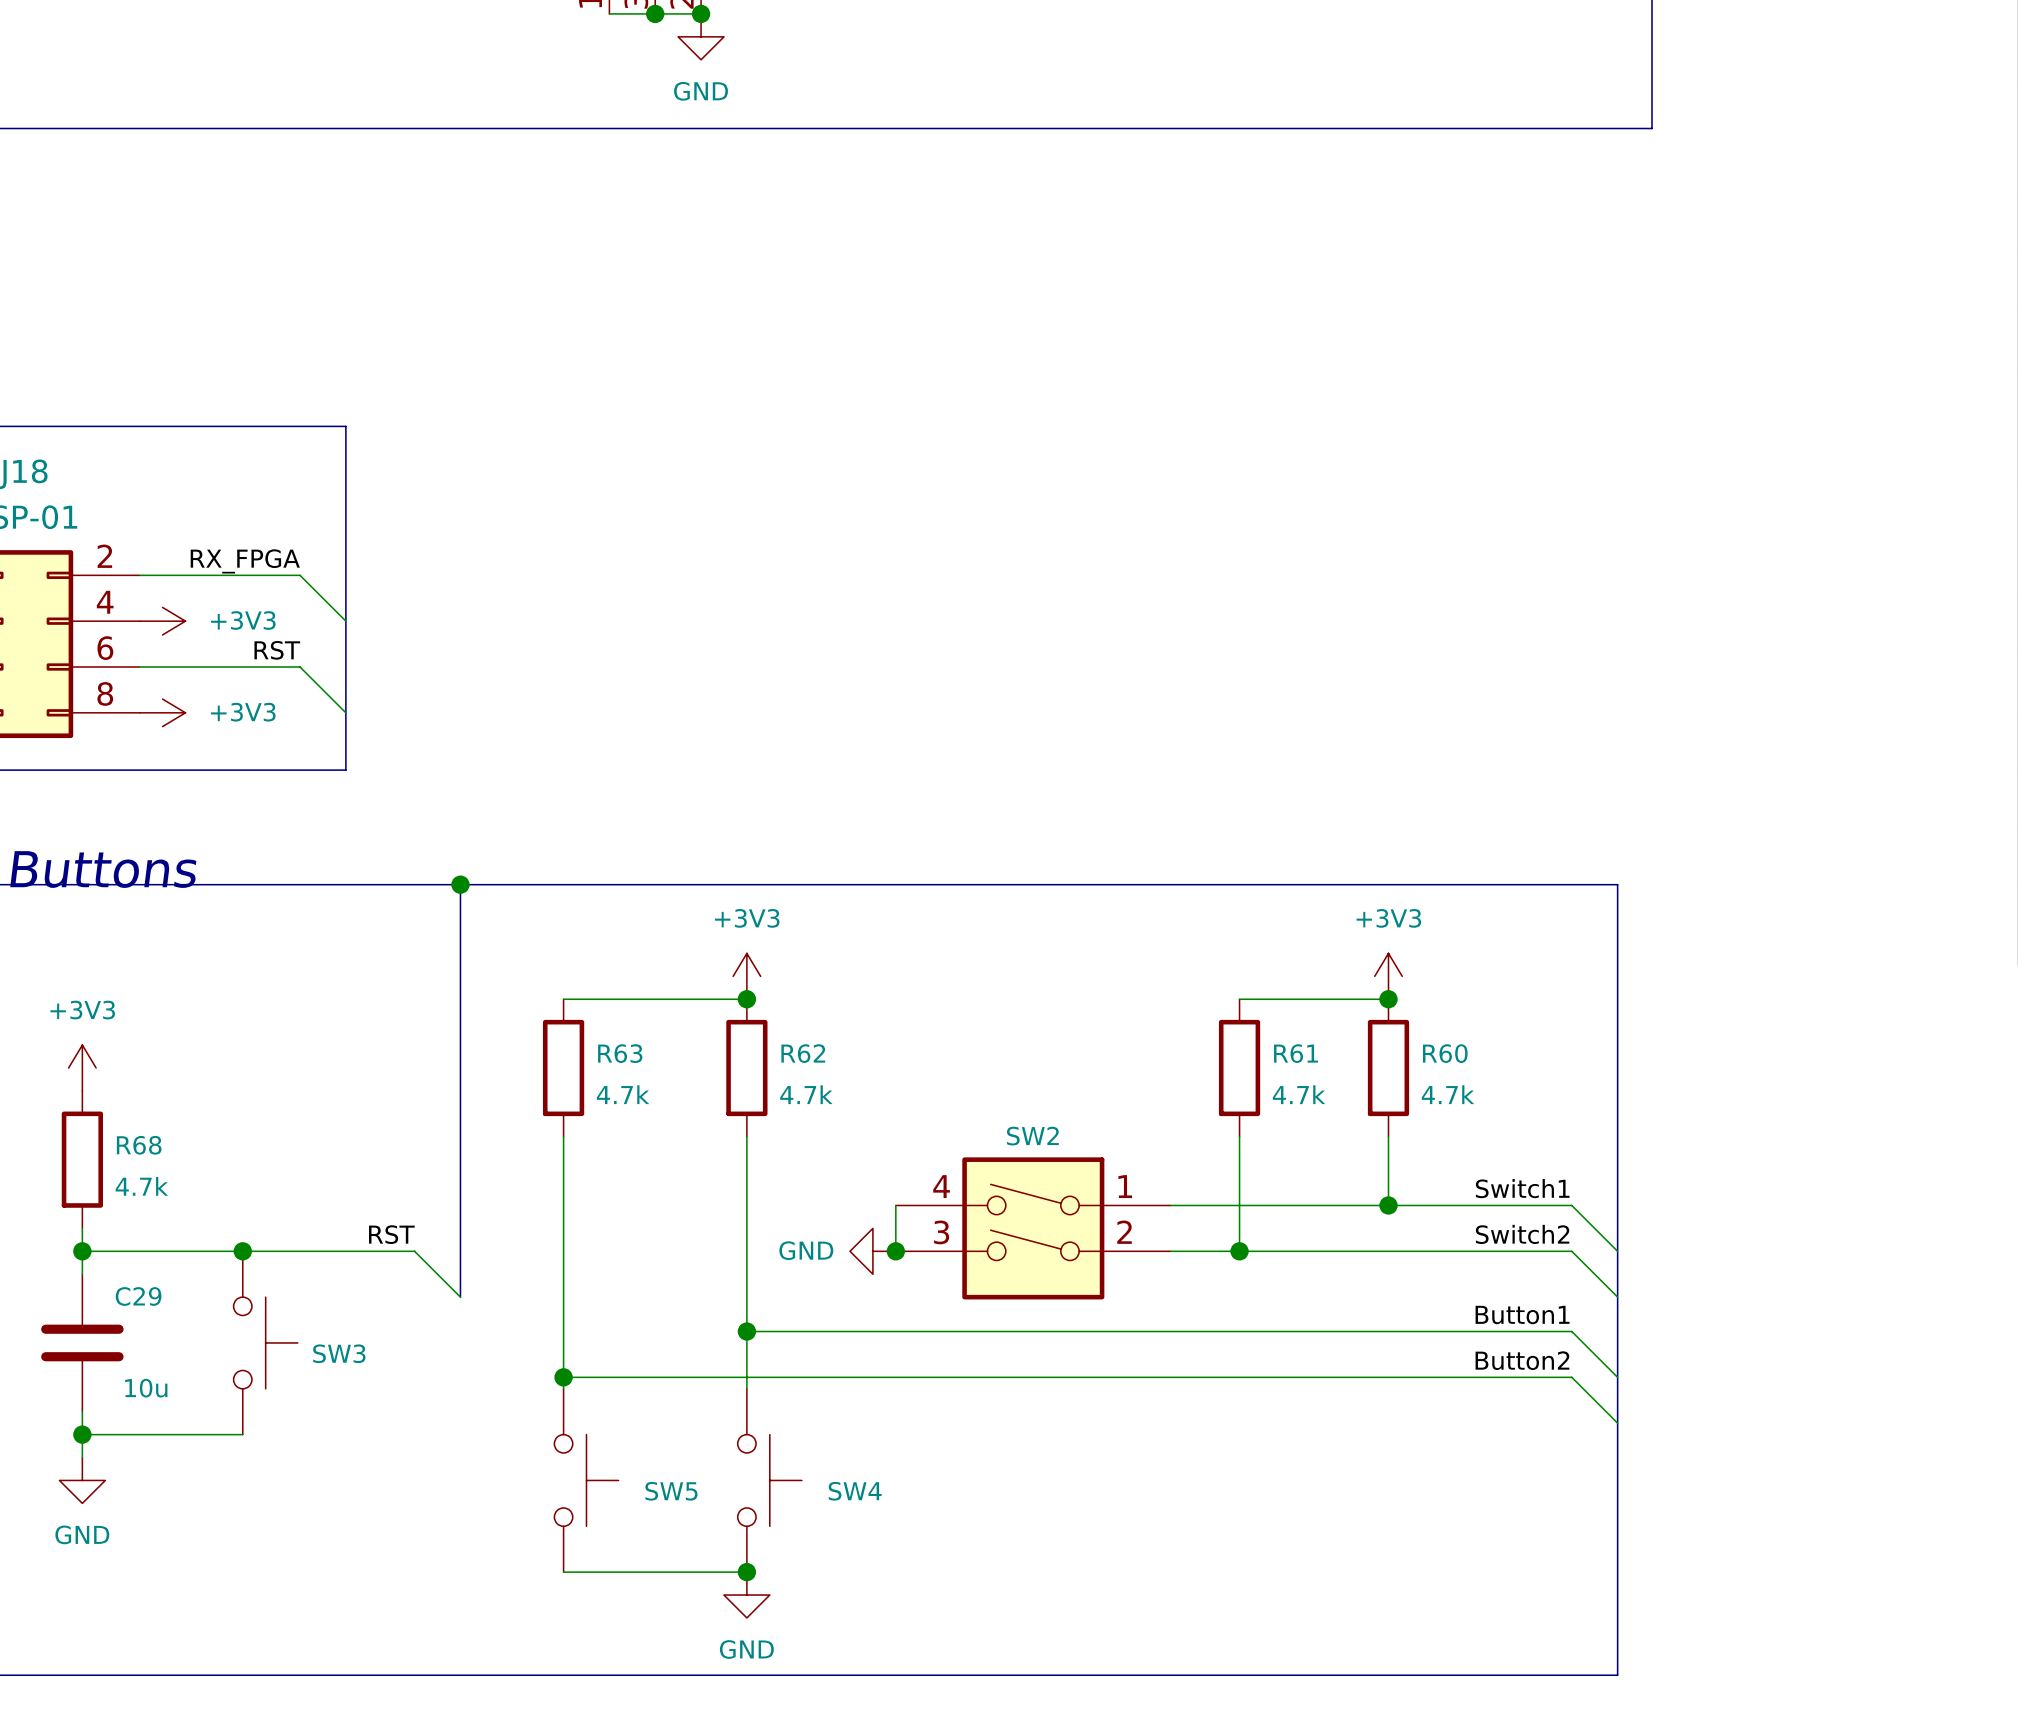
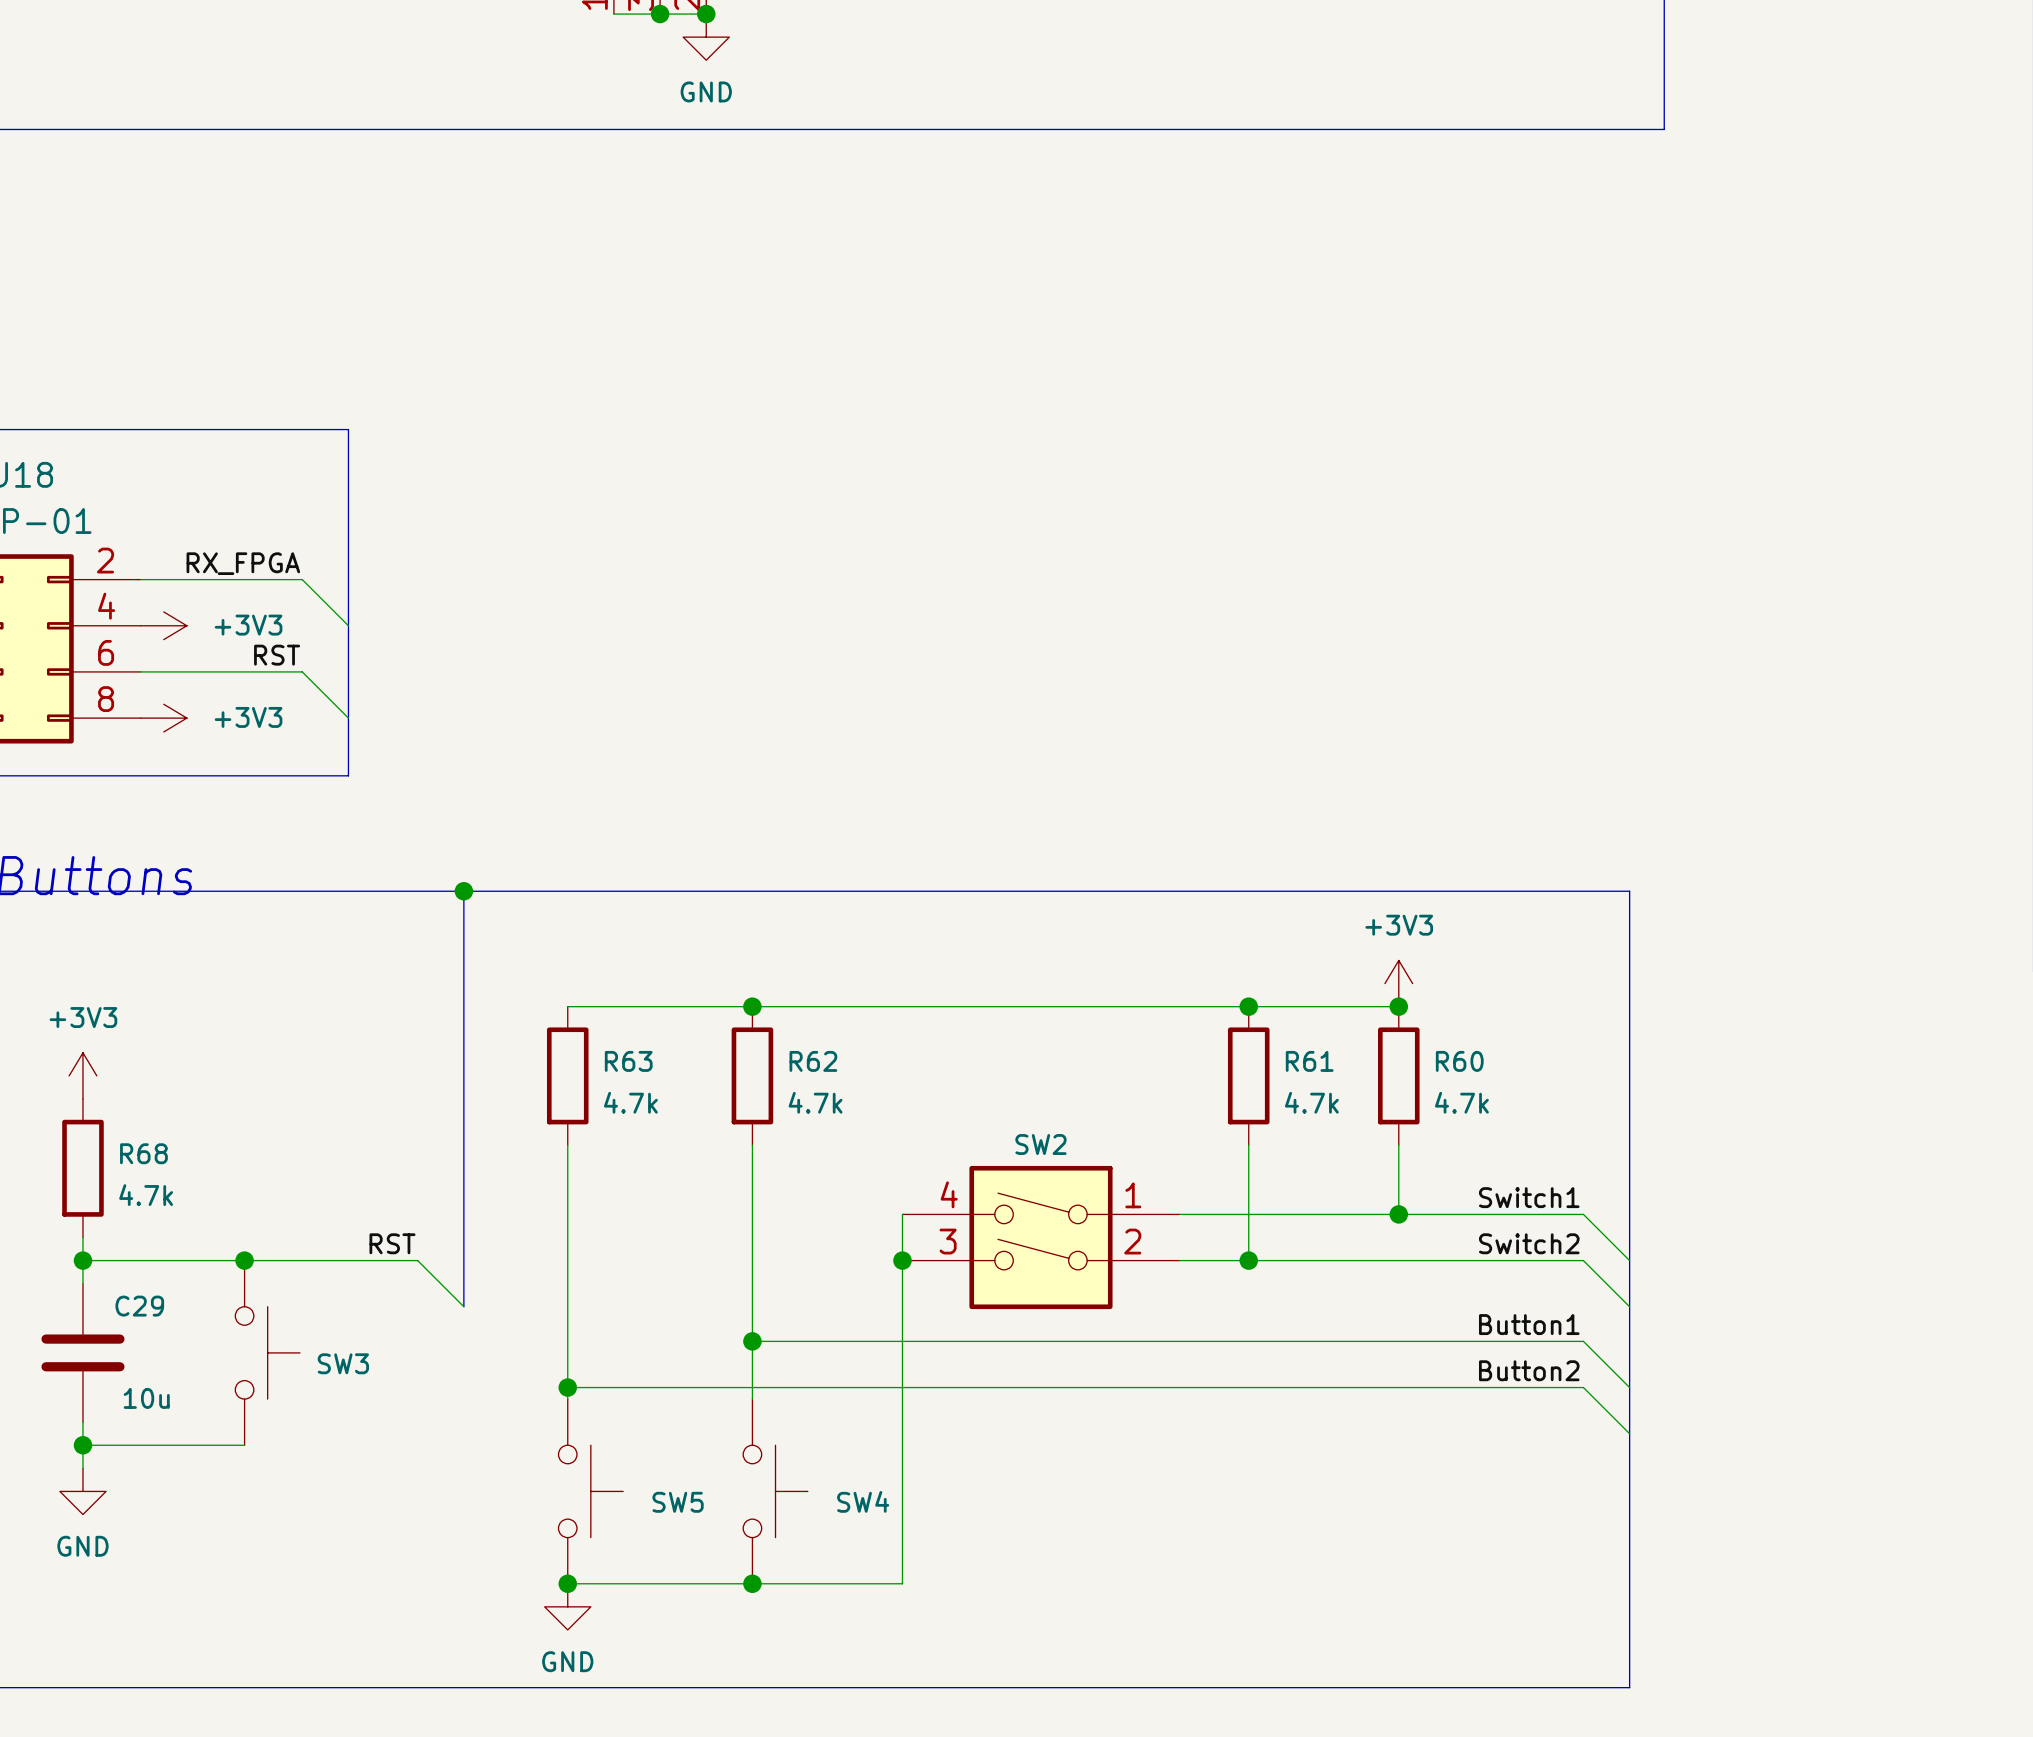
power symbol: +3V3 (746, 976) -> none
wire: none -> (752, 1006) (1248, 1006)
junction: none -> (1248, 1006)
power symbol: GND (872, 1251) -> none
wire: none -> (902, 1260) (902, 1583) (752, 1583)
junction: none -> (567, 1583)
power symbol position: GND (746, 1595) -> GND (567, 1606)

